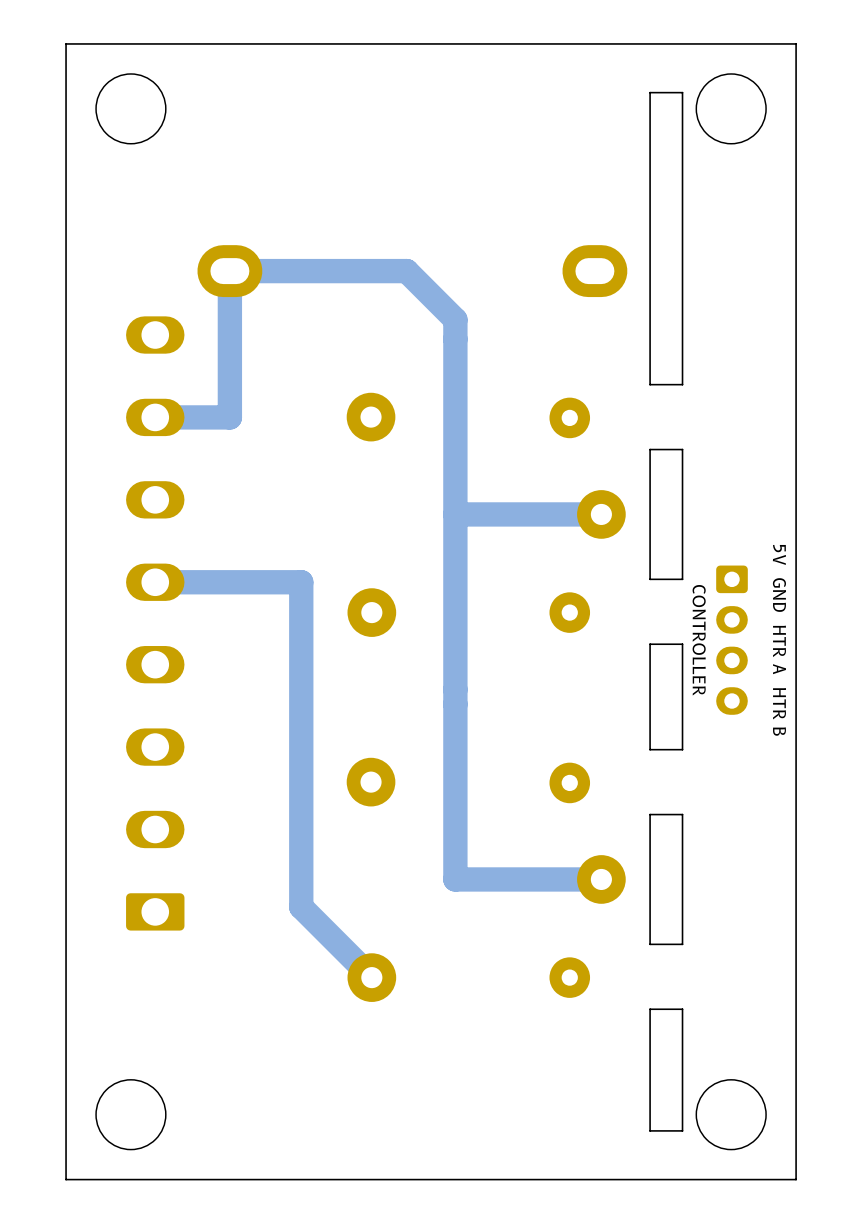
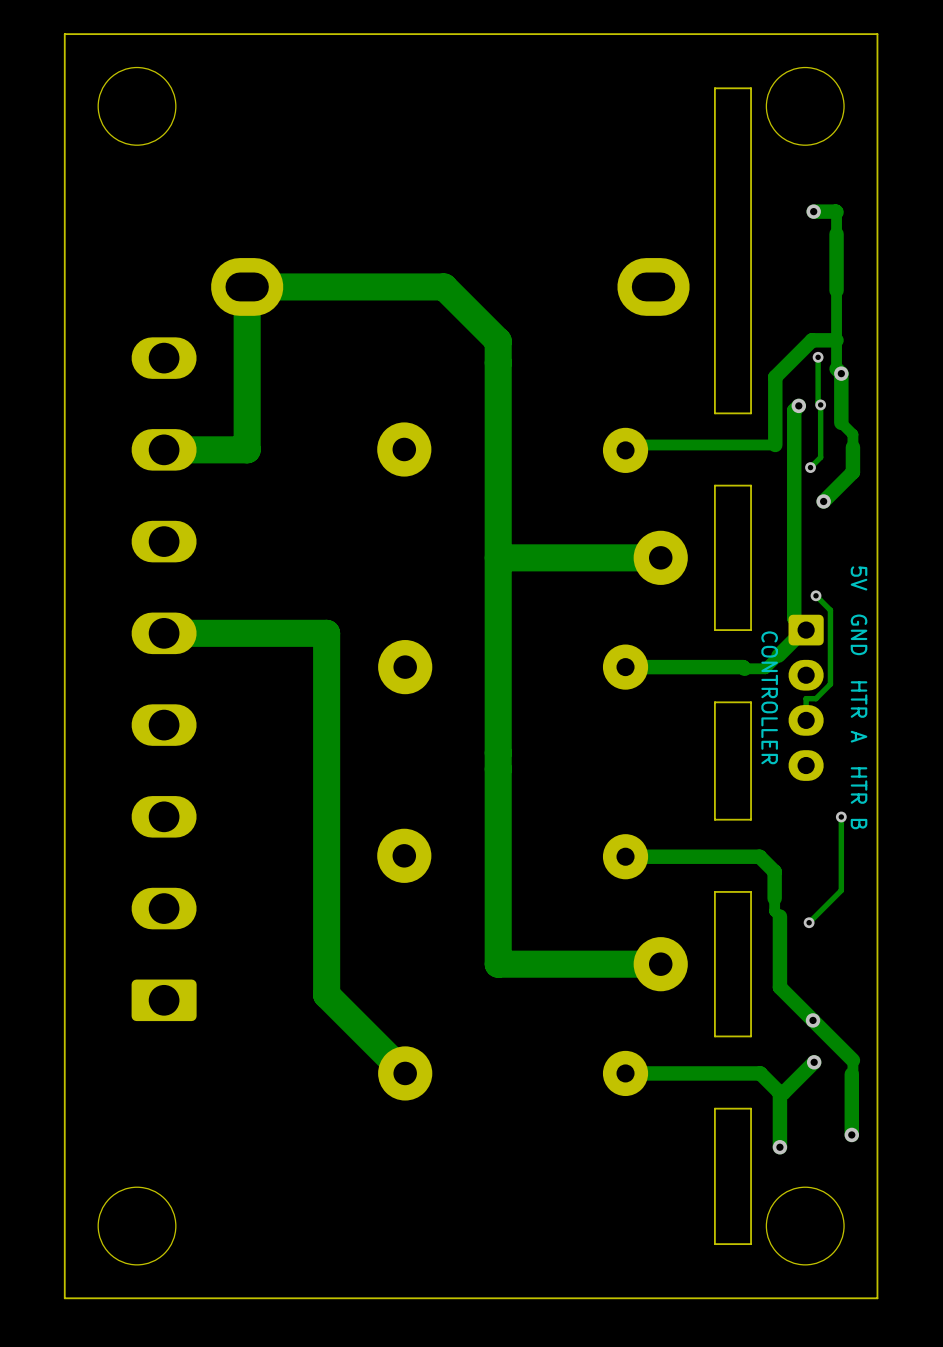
track: none -> (813, 211) (836, 212) (836, 368) (841, 373) (841, 422) (852, 434) (852, 472) (823, 501)
via: none -> (813, 211)
track: none -> (836, 340) (812, 340) (775, 377) (775, 444) (630, 444) (625, 450)
track: none -> (818, 357) (820, 457) (810, 467)
via: none -> (818, 357)
via: none -> (841, 373)
track: none -> (798, 405) (794, 410) (794, 618) (806, 630) (765, 668) (625, 667)
via: none -> (798, 405)
via: none -> (820, 404)
via: none -> (810, 467)
via: none -> (823, 501)
track: none -> (816, 595) (830, 610) (830, 684) (815, 698) (806, 698) (806, 720)
via: none -> (816, 595)
track: none -> (841, 817) (841, 890) (809, 922)
via: none -> (841, 817)
track: none -> (625, 856) (759, 856) (774, 871) (774, 911) (779, 916) (779, 987) (852, 1060) (851, 1134)
via: none -> (809, 922)
via: none -> (813, 1020)
track: none -> (814, 1062) (783, 1093) (779, 1093)
via: none -> (814, 1062)
track: none -> (625, 1073) (760, 1073) (779, 1093)
track: none -> (779, 1093) (779, 1147)
via: none -> (851, 1134)
via: none -> (779, 1147)

